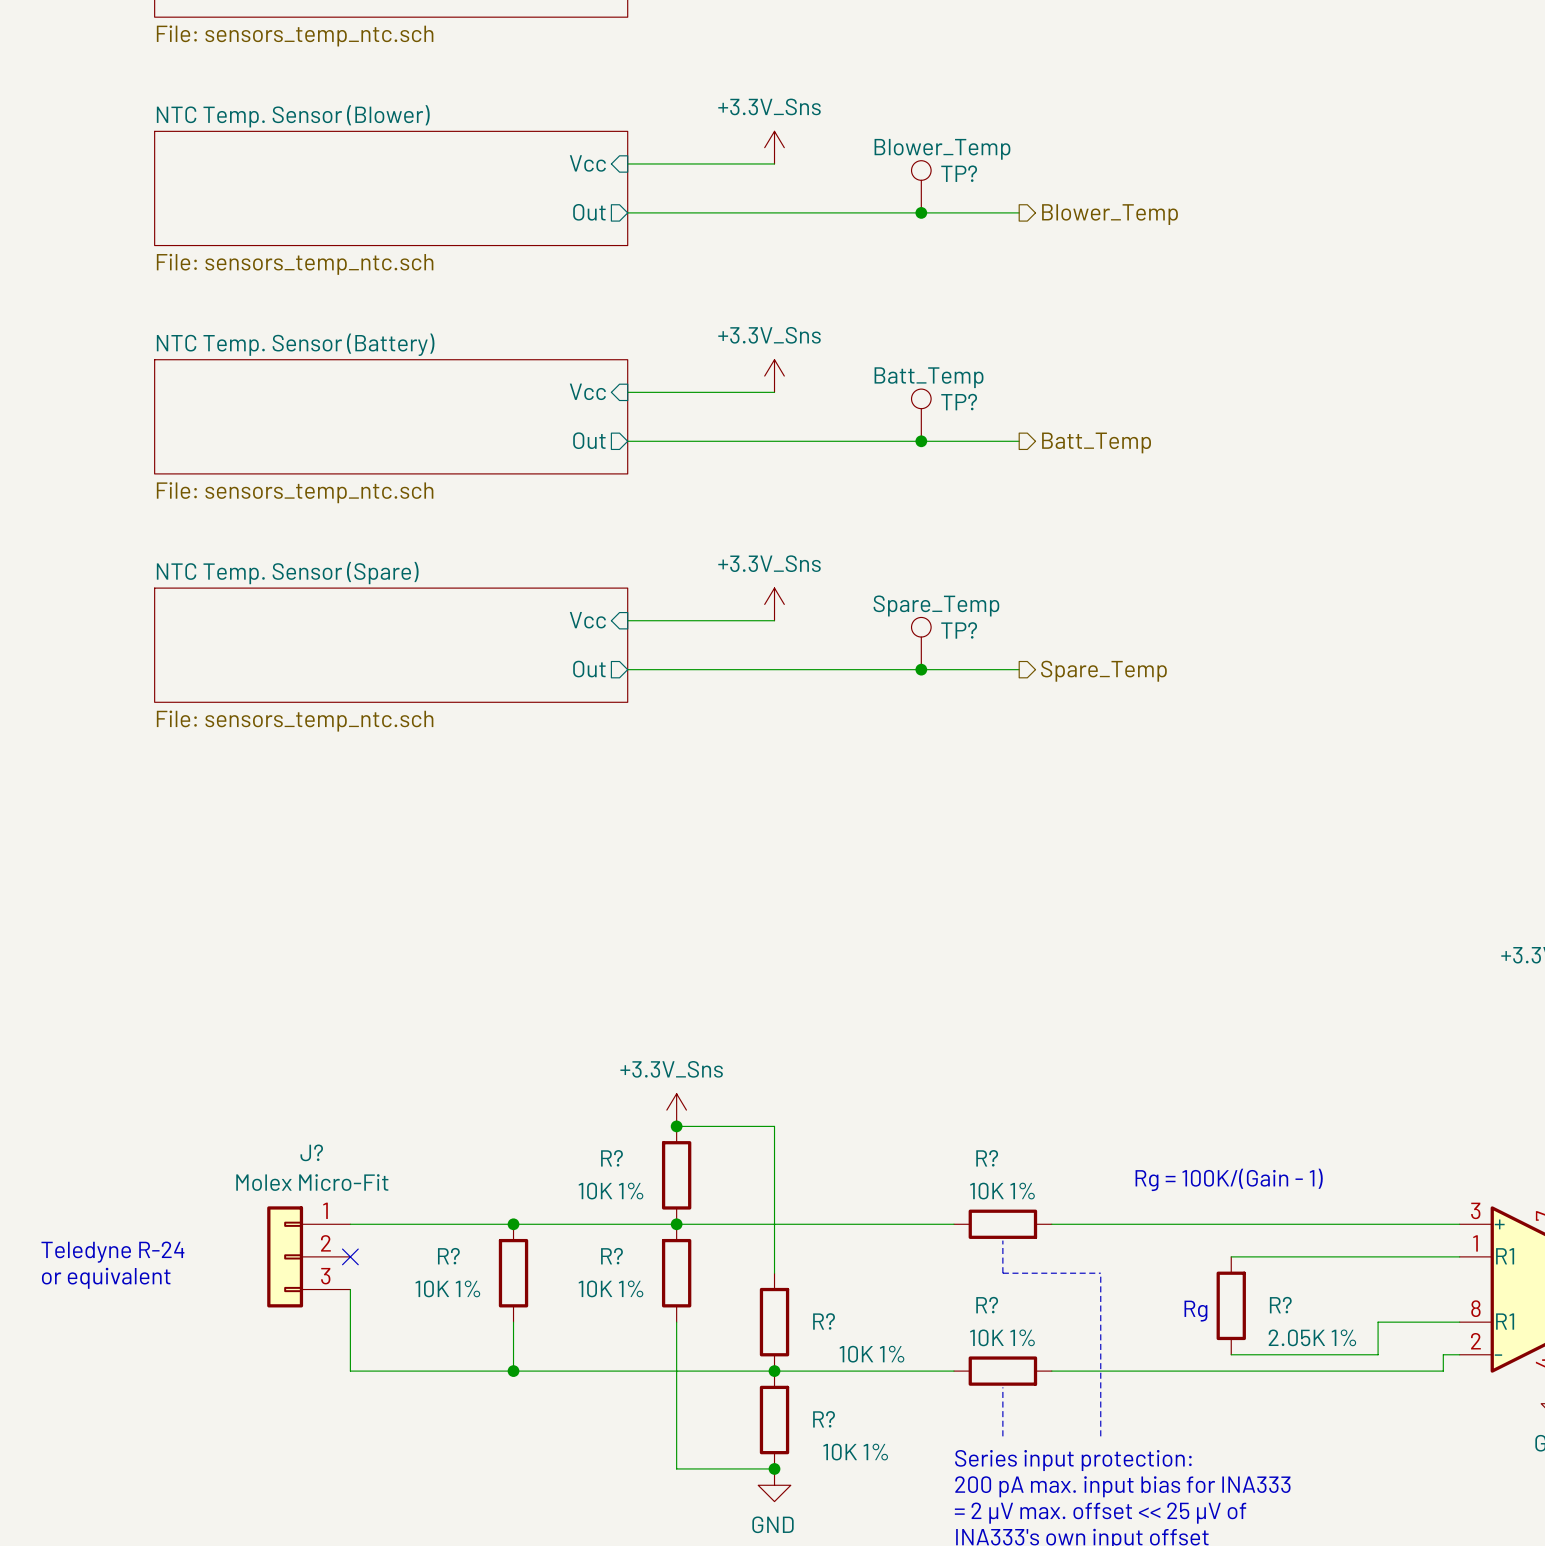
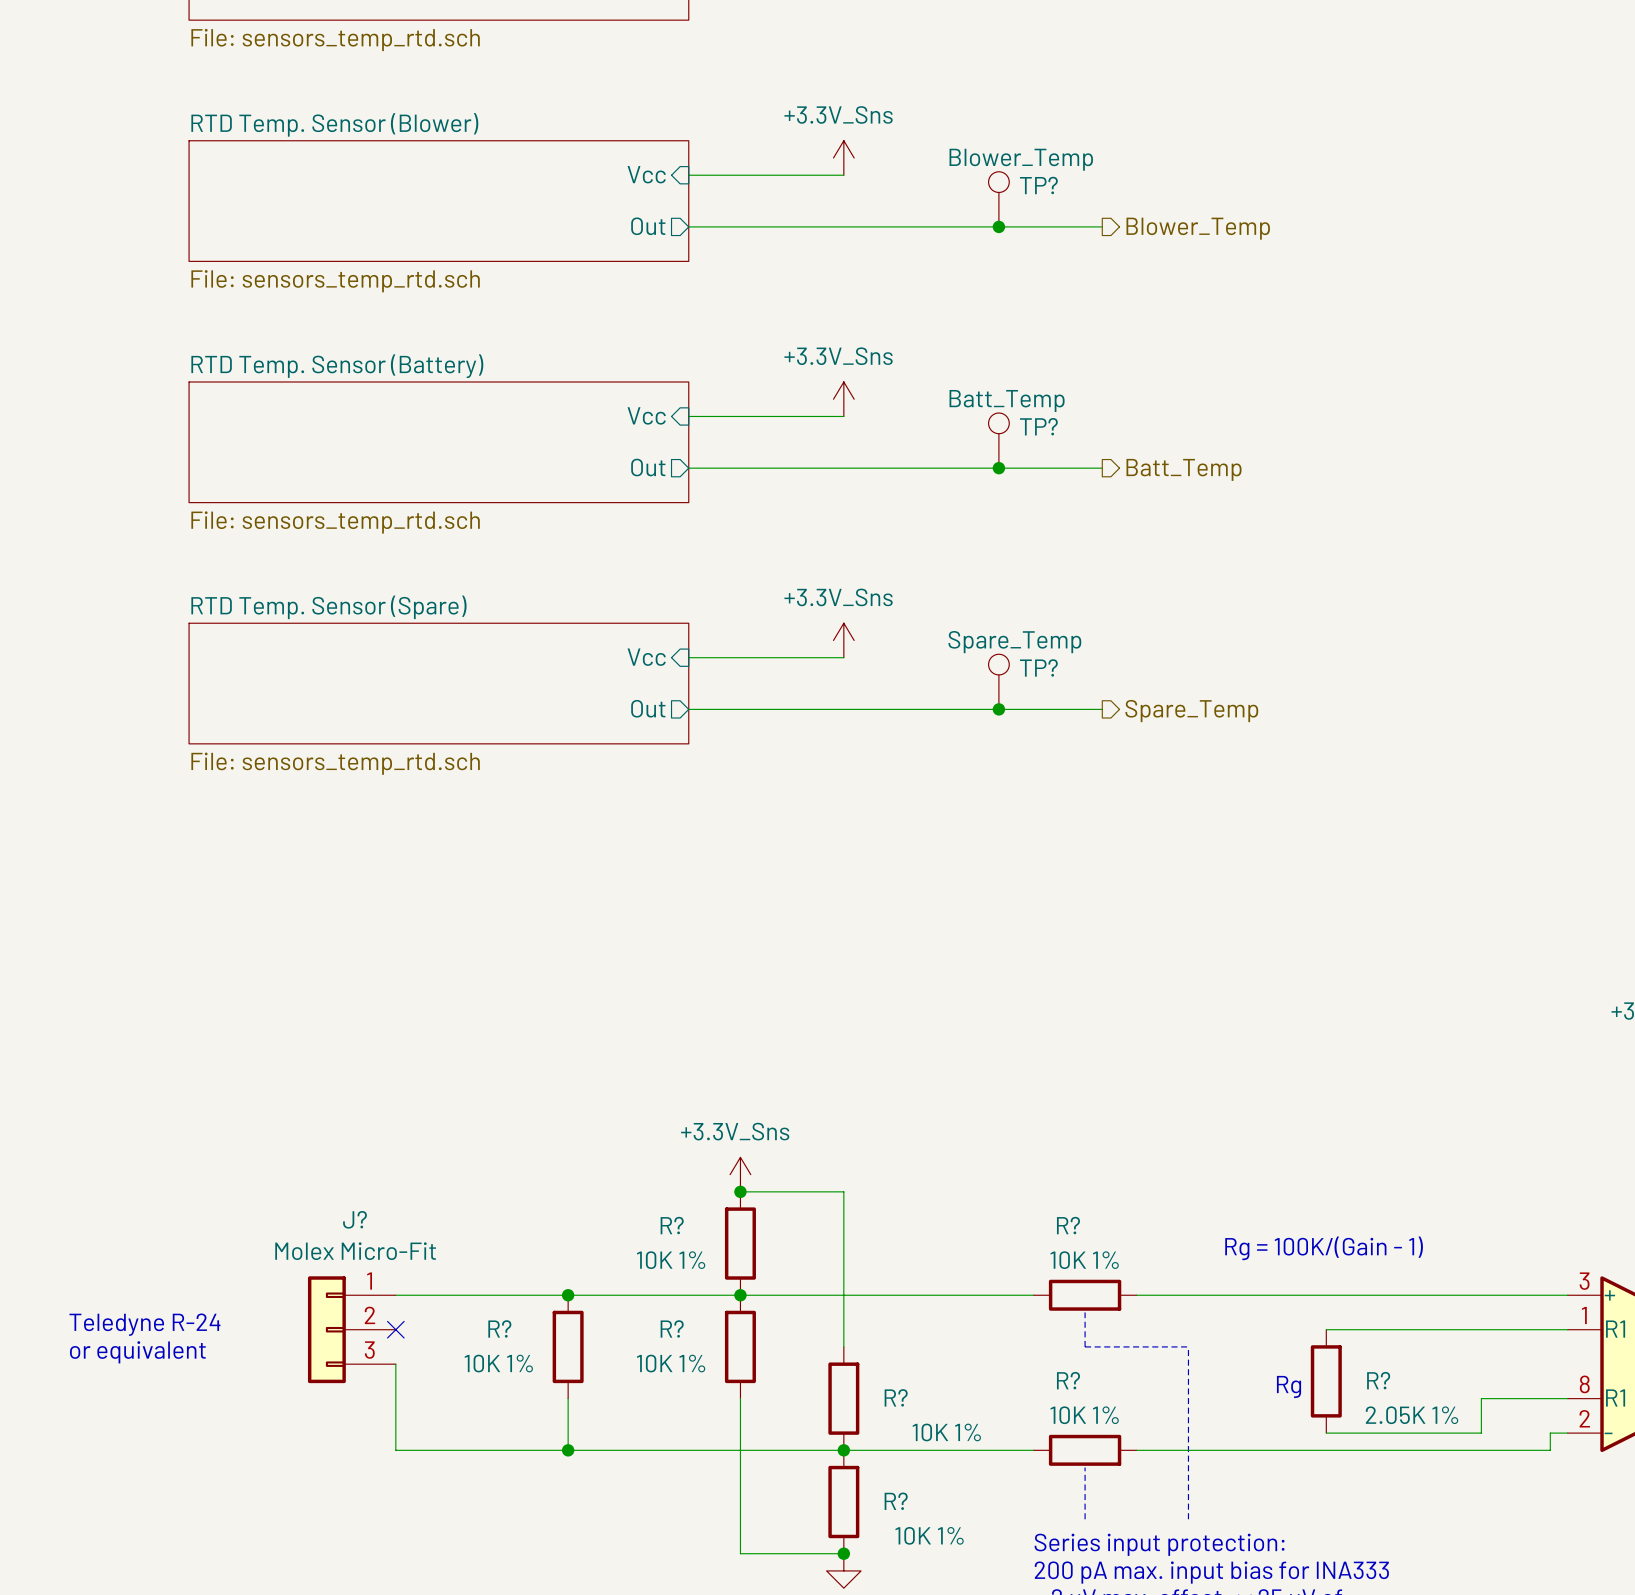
sheet value: File: sensors_temp_ntc.sch (295, 35) -> File: sensors_temp_rtd.sch (335, 39)
sheet NTC Temp. Sensor (Blower) name: NTC Temp. Sensor (Blower) (293, 116) -> RTD Temp. Sensor (Blower) (334, 124)
sheet NTC Temp. Sensor (Blower) value: File: sensors_temp_ntc.sch (295, 264) -> File: sensors_temp_rtd.sch (335, 281)
sheet NTC Temp. Sensor (Battery) name: NTC Temp. Sensor (Battery) (295, 344) -> RTD Temp. Sensor (Battery) (337, 366)
sheet NTC Temp. Sensor (Battery) value: File: sensors_temp_ntc.sch (295, 492) -> File: sensors_temp_rtd.sch (335, 522)
sheet NTC Temp. Sensor (Spare) name: NTC Temp. Sensor (Spare) (287, 573) -> RTD Temp. Sensor (Spare) (328, 607)
sheet NTC Temp. Sensor (Spare) value: File: sensors_temp_ntc.sch (295, 721) -> File: sensors_temp_rtd.sch (335, 763)

